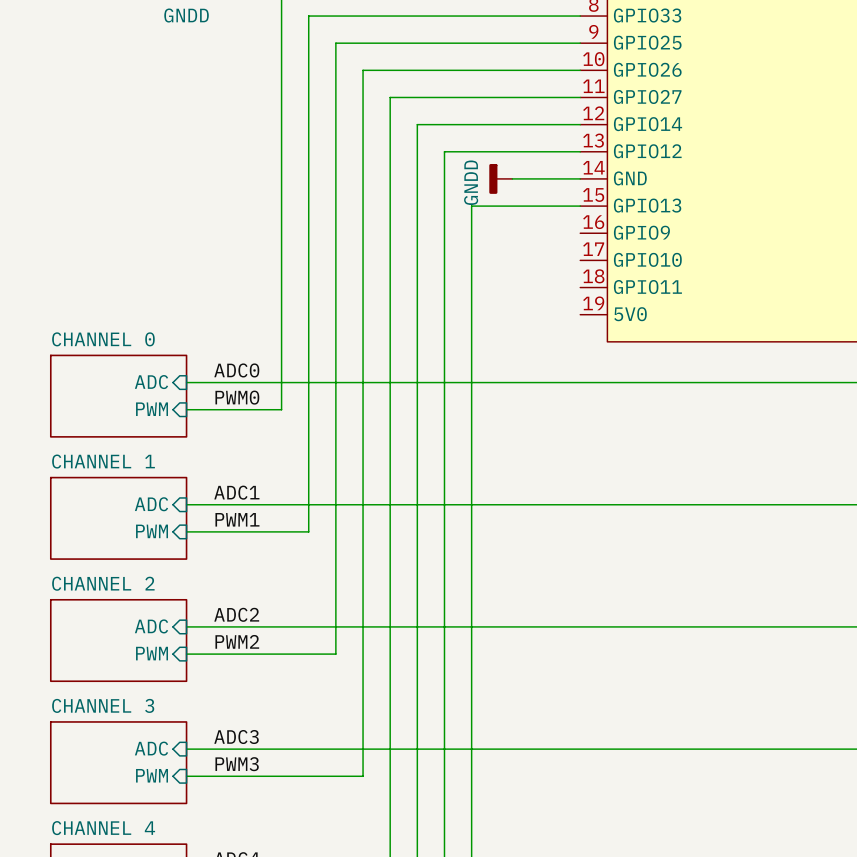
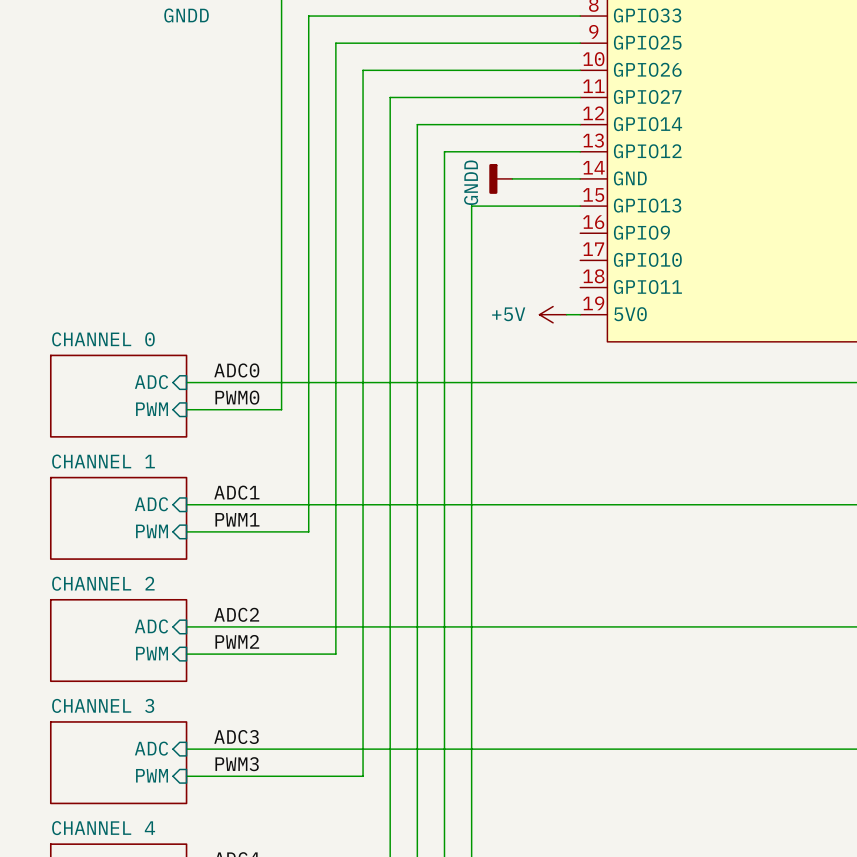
power symbol: none -> +5V (553, 314)
wire: none -> (566, 314) (580, 314)

